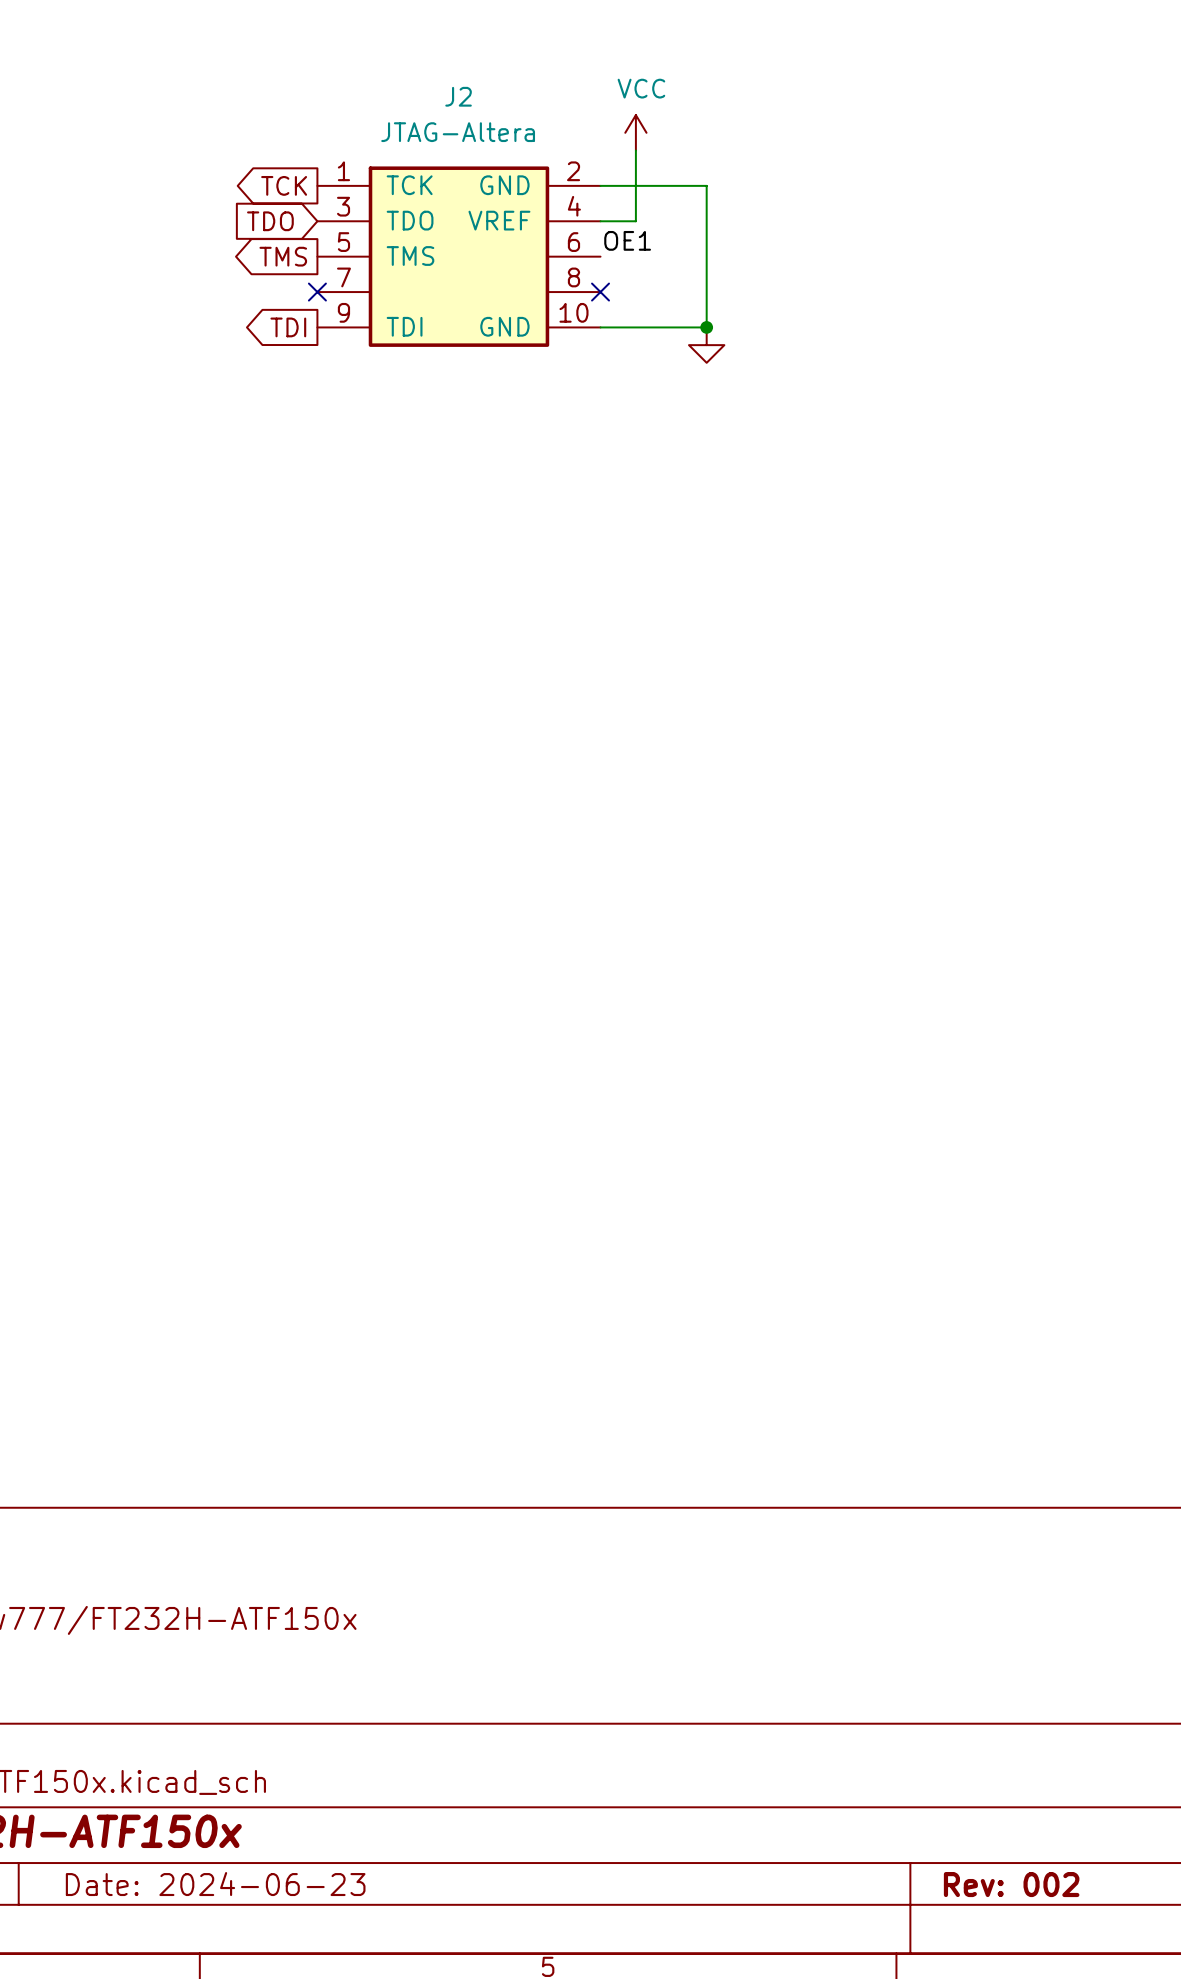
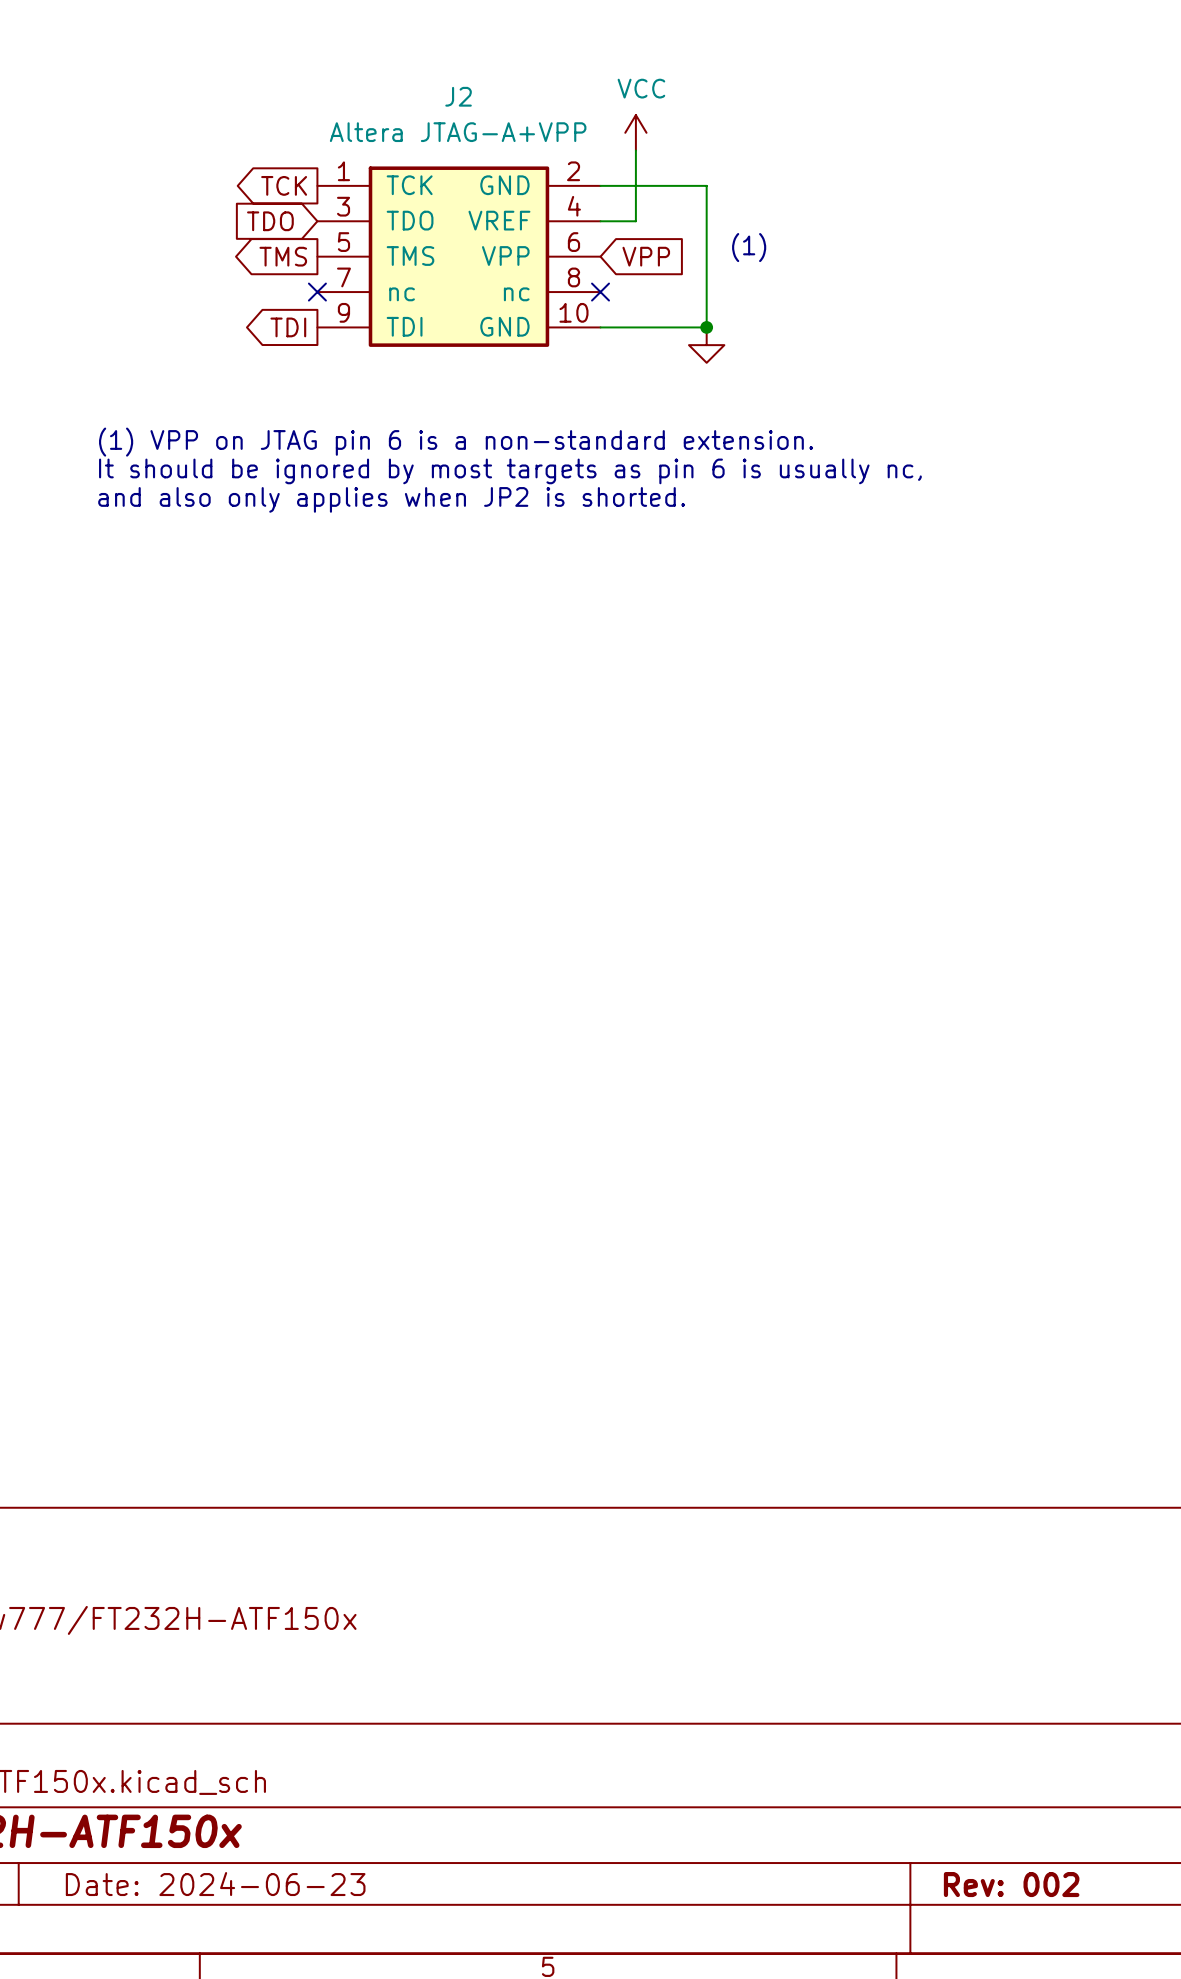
J2 value: JTAG-Altera (458, 132) -> Altera JTAG-A+VPP (458, 132)
label: OE1 (627, 240) -> none
text: none -> (1) (749, 247)
J2 pin name: none -> VPP (505, 256)
global label: none -> VPP (646, 256)
J2 pin name: none -> nc (402, 294)
J2 pin name: none -> nc (516, 294)
text: none -> (1) VPP on JTAG pin 6 is a non-standard extension. (456, 442)
text: none -> It should be ignored by most targets as pin 6 is usually nc, (510, 471)
text: none -> and also only applies when JP2 is shorted. (391, 499)

